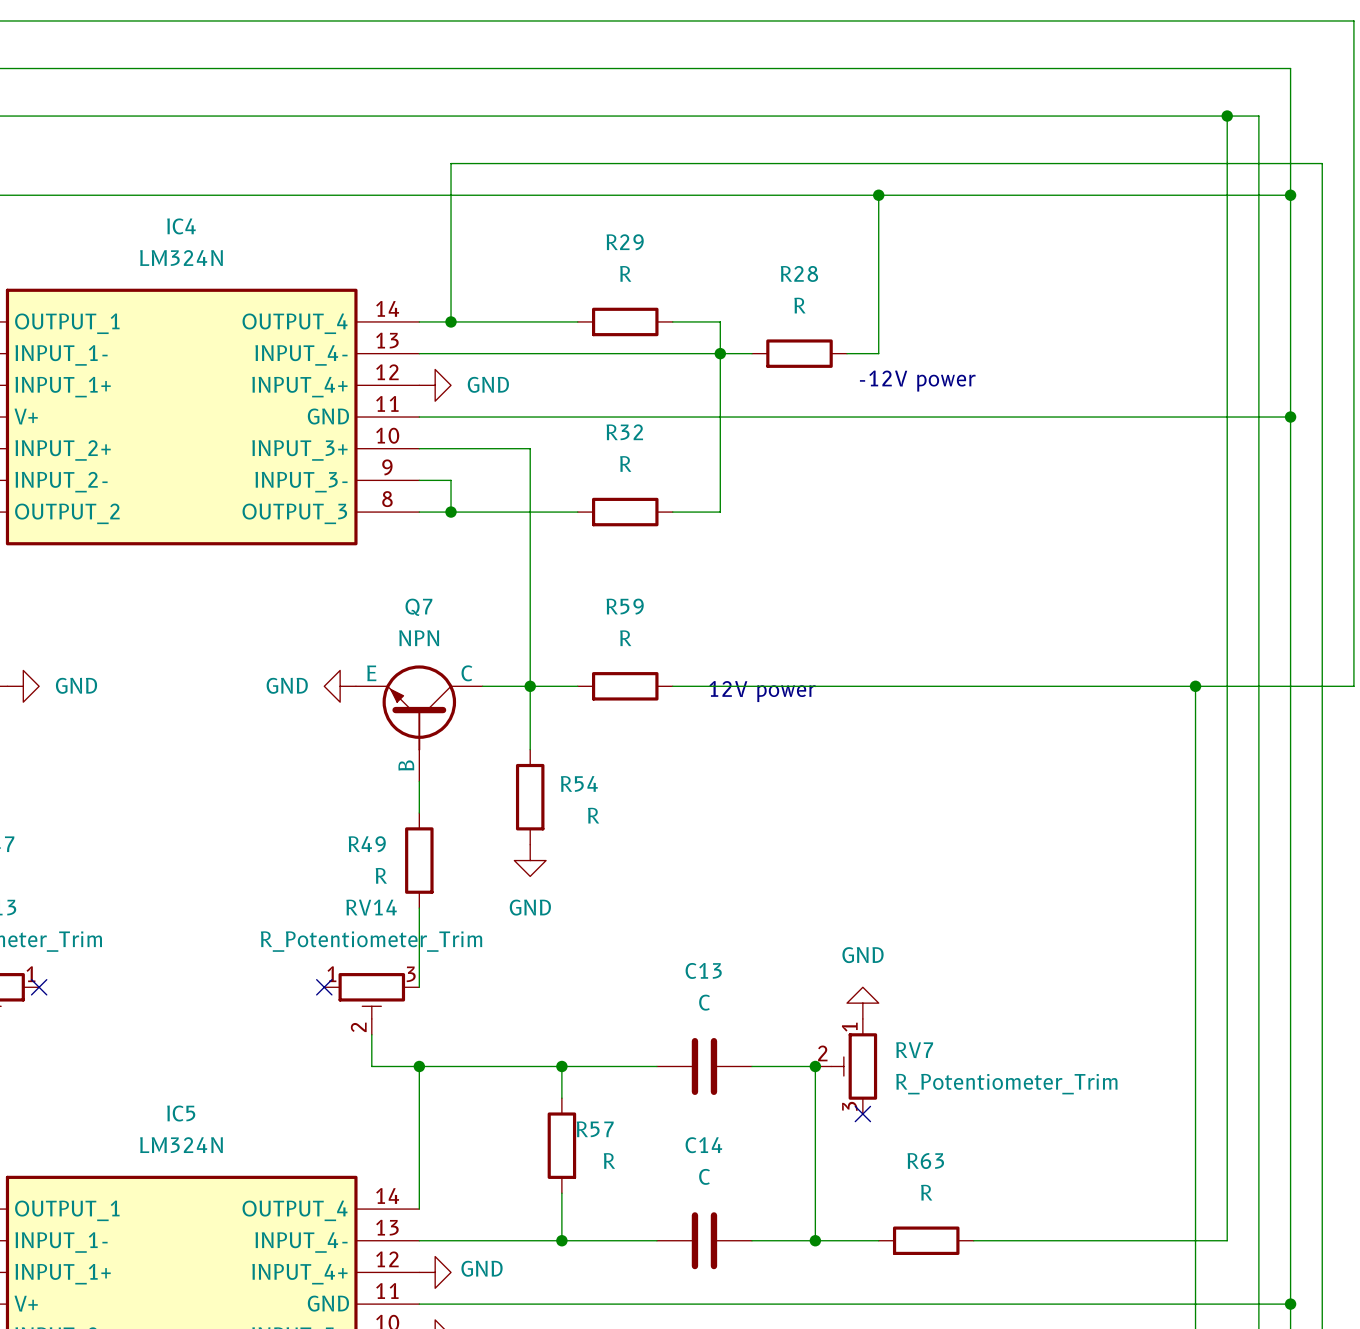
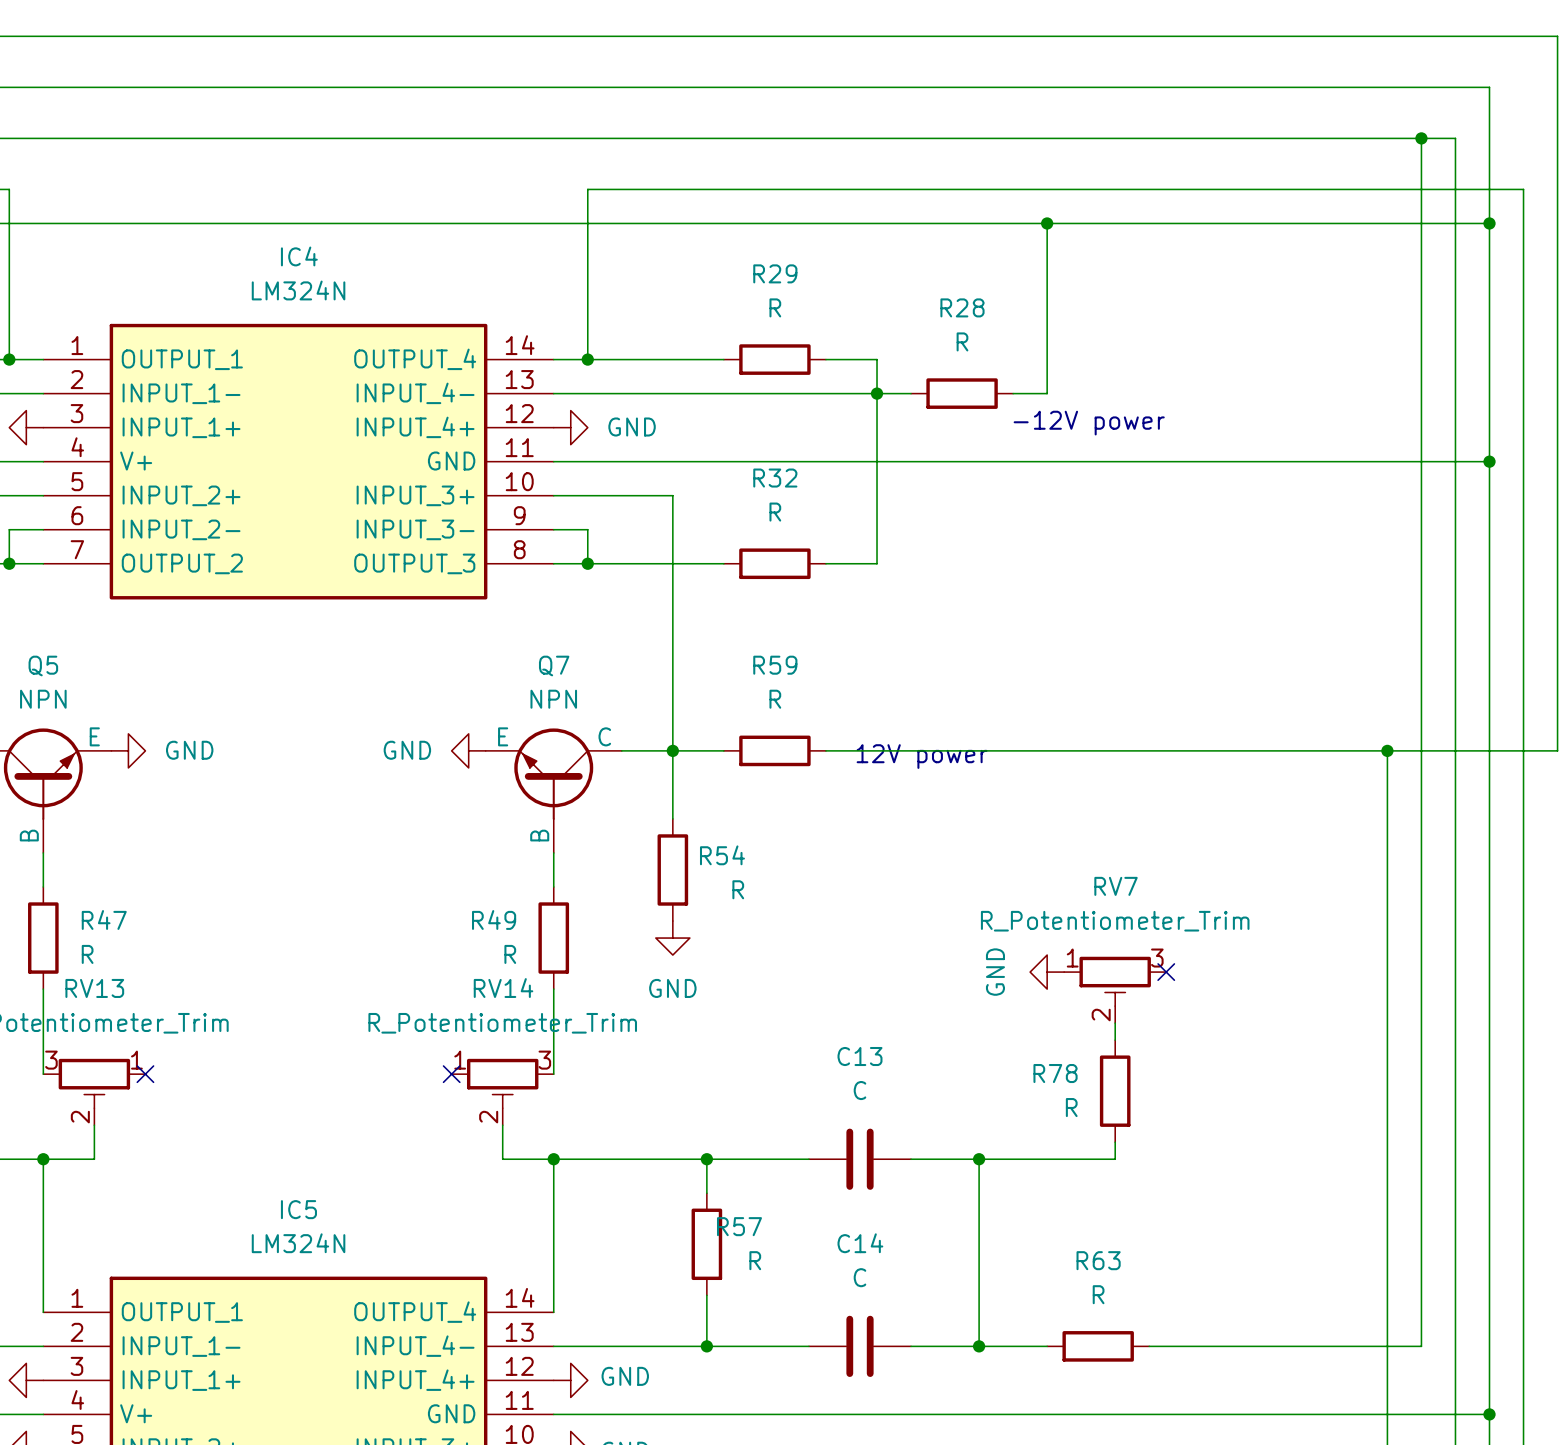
no-connect mark: none -> (1166, 972)
wire: none -> (1115, 1023) (1115, 1040)
power symbol rotation: 0° (862, 1003) -> 90° counterclockwise (1047, 972)
power symbol position: GND (862, 1003) -> GND (1047, 972)
R78: none -> R (1115, 1091)
RV7 name position: RV7 (914, 1050) -> RV7 (1116, 886)
wire: none -> (1115, 1142) (1115, 1159) (979, 1159)
RV7 position: (846, 1066) -> (1115, 989)
RV7 rotation: 0° (854, 1066) -> 90° counterclockwise (1115, 981)
RV7 value position: R_Potentiometer_Trim (1006, 1084) -> R_Potentiometer_Trim (1115, 921)
no-connect mark: (862, 1114) -> none

